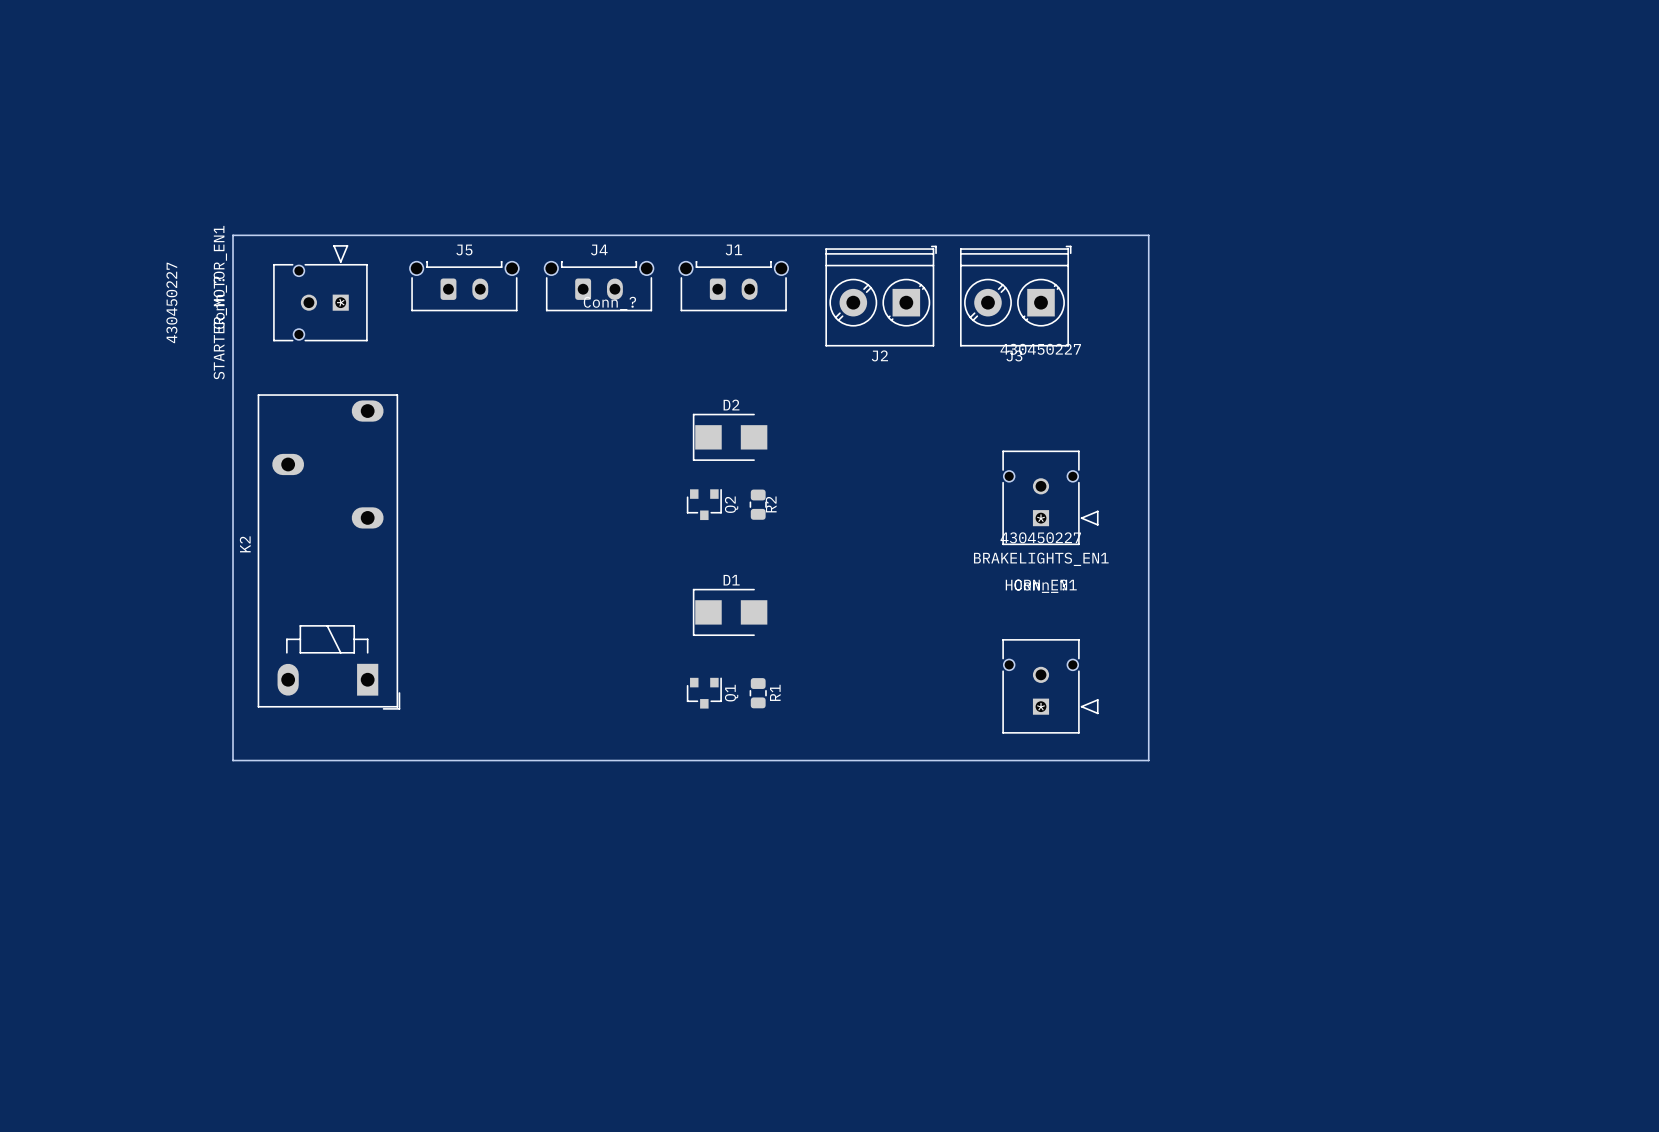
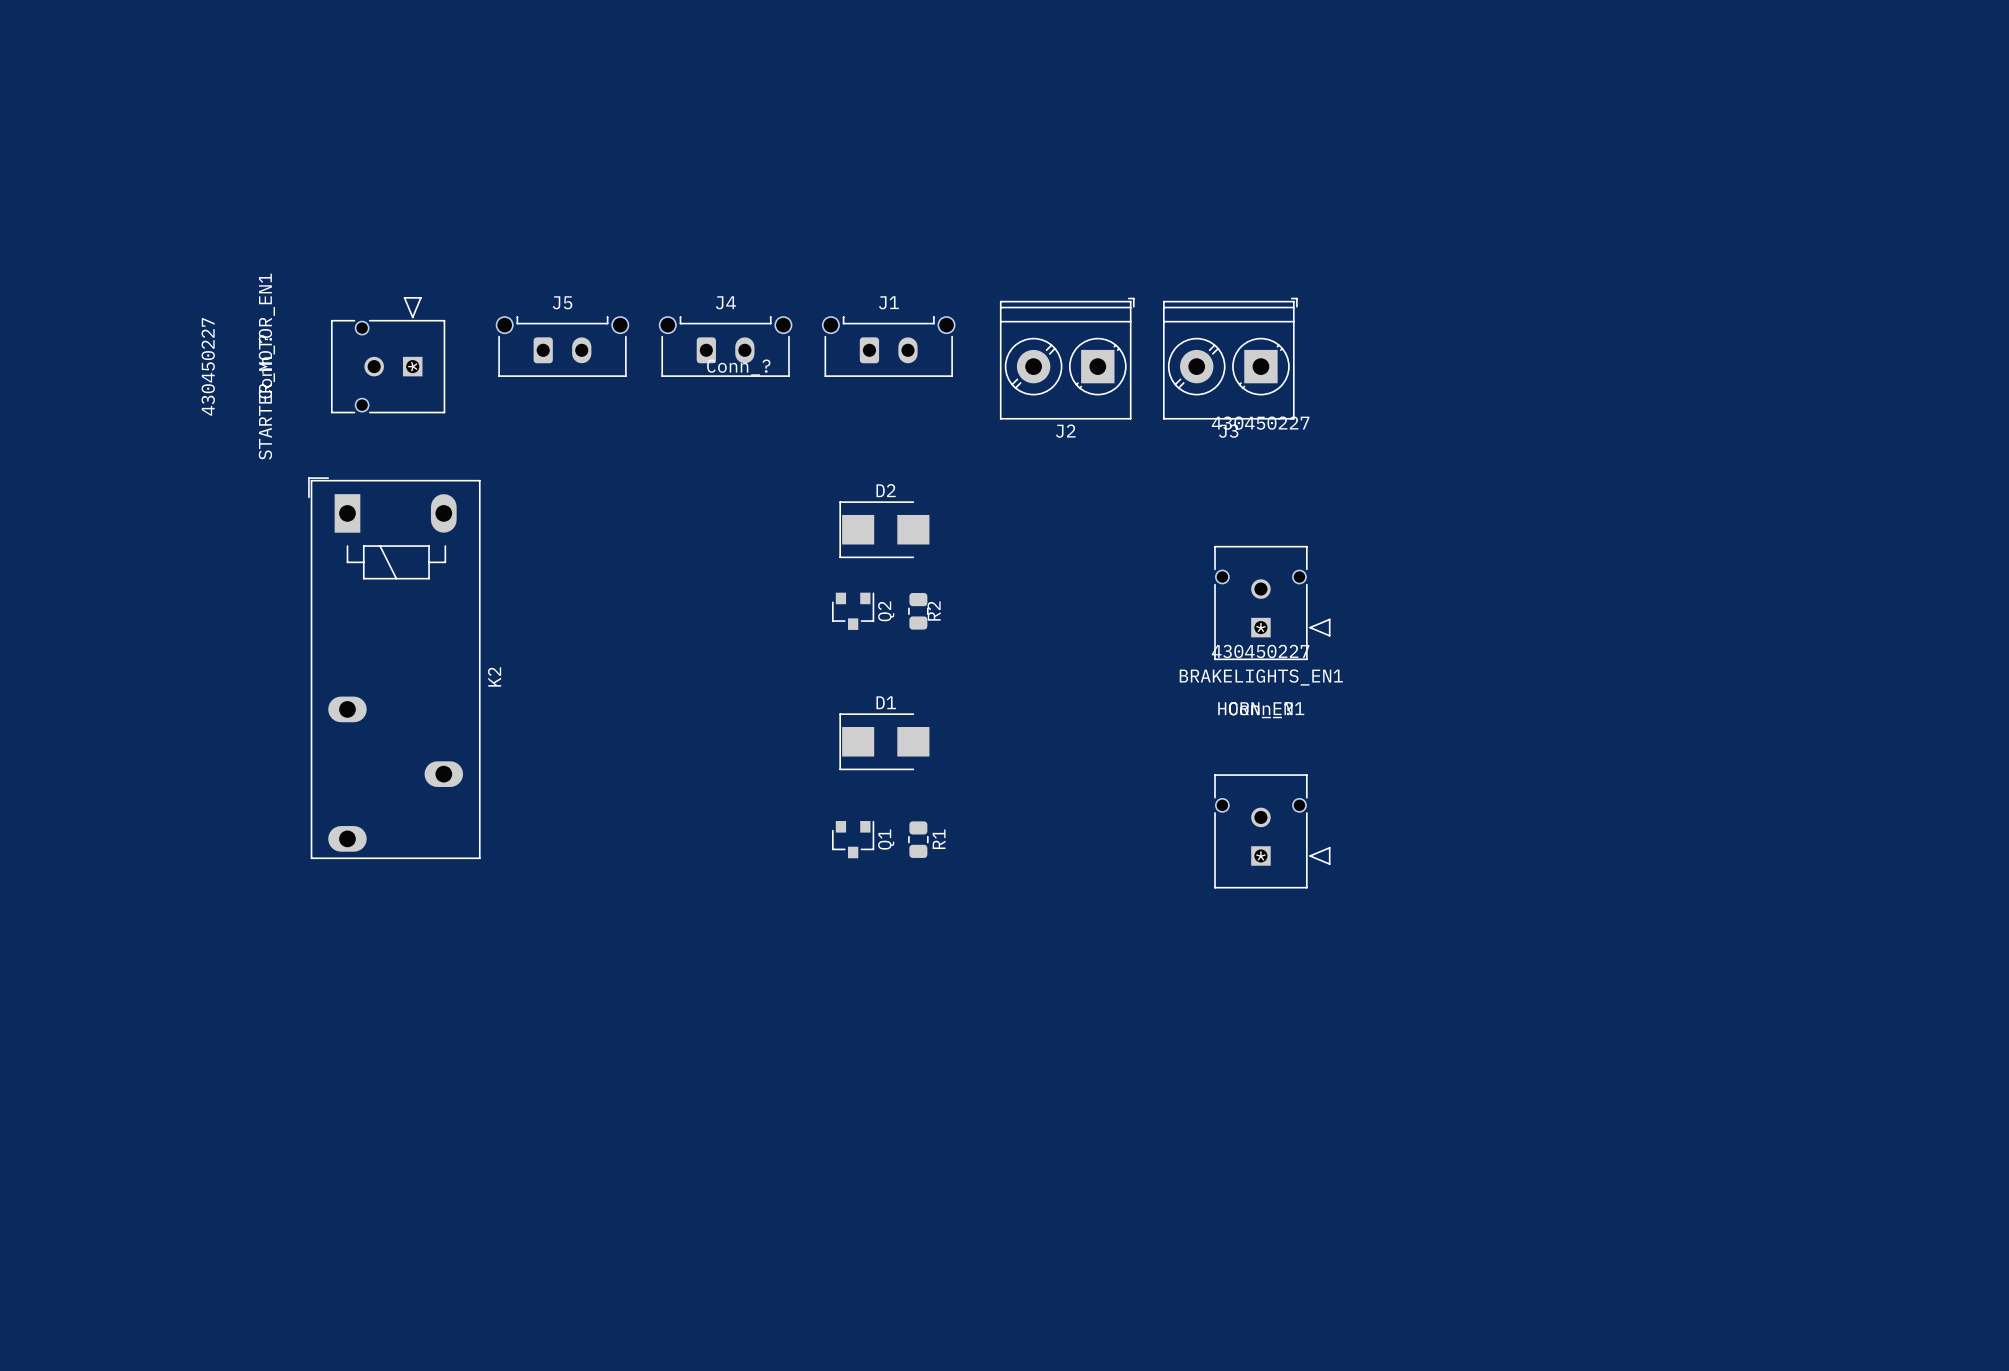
board edge: (233, 235) (1148, 235) (1148, 760) (233, 760) (233, 235) -> none
K2 rotation: 0° (328, 551) -> 180° (394, 668)

